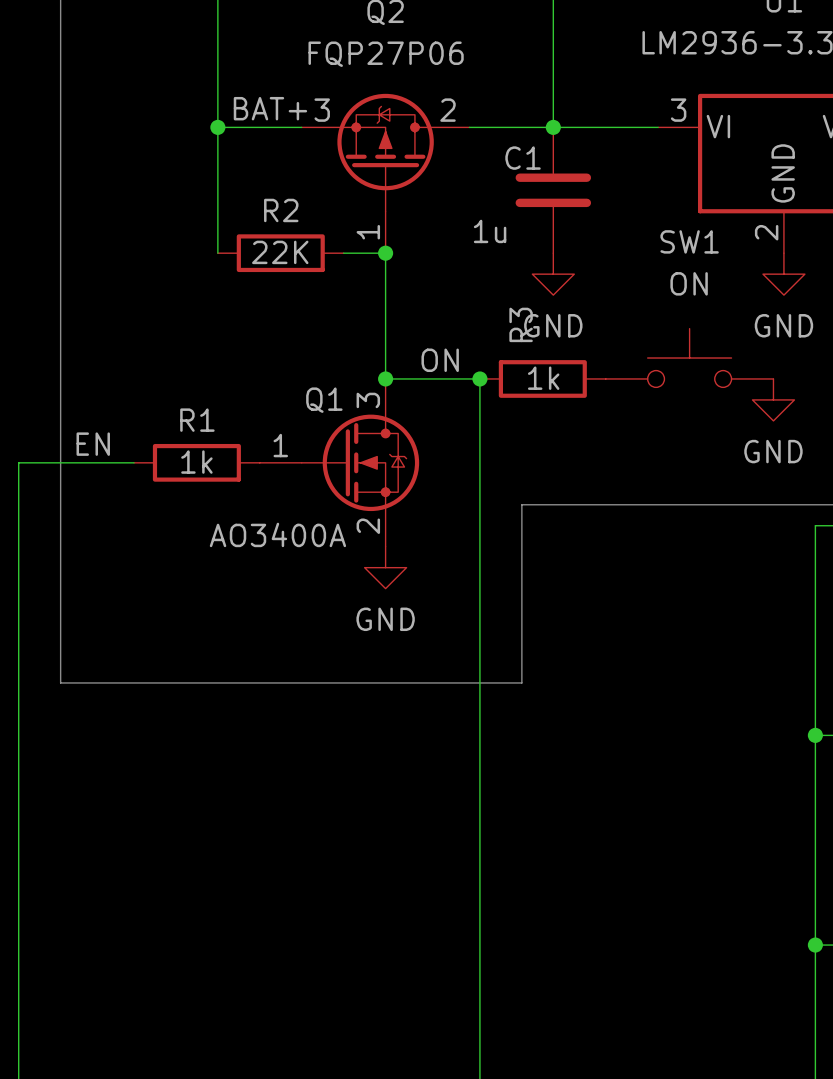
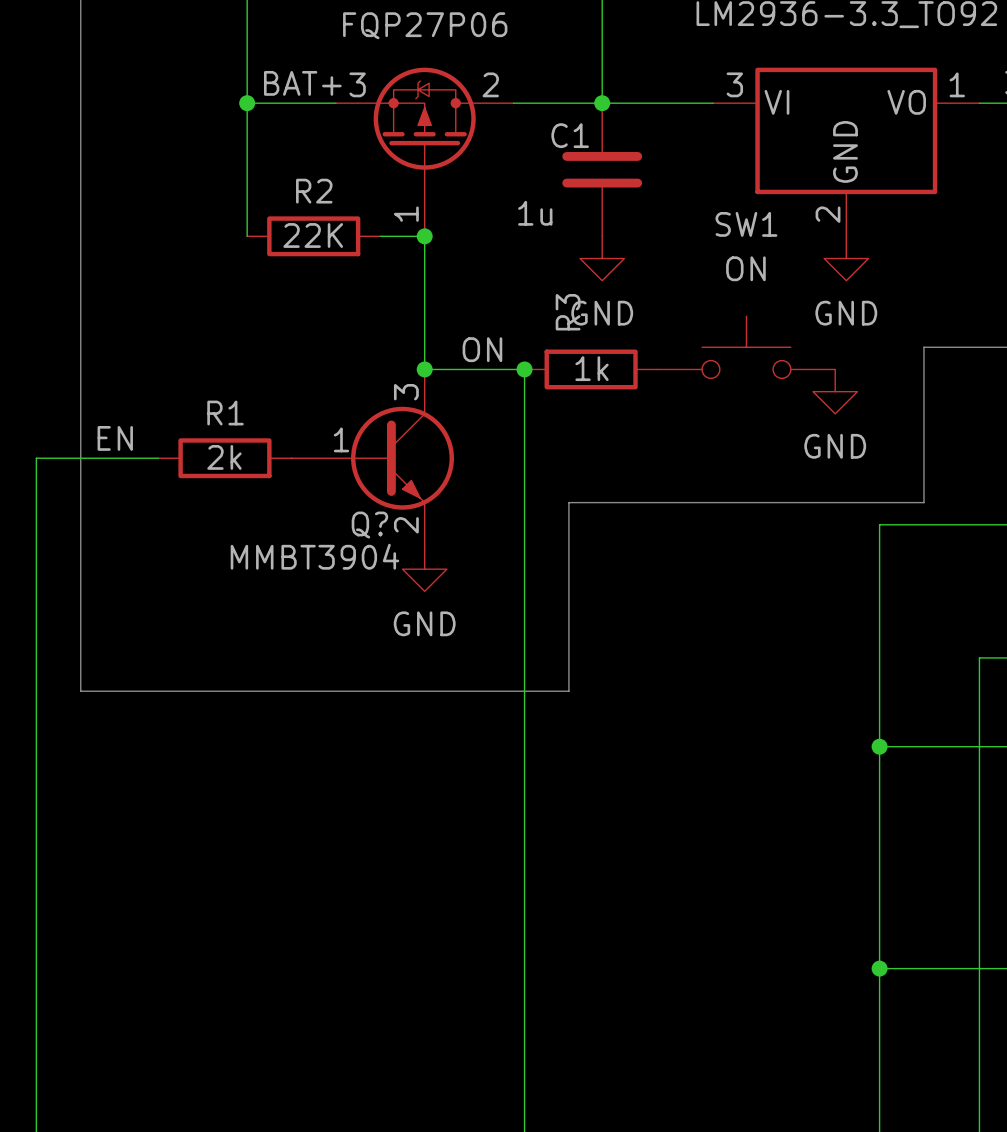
R1 value: 1k (196, 462) -> 2k (224, 457)
Q?: none -> MMBT3904 (372, 458)
Q1: AO3400A (339, 462) -> none

